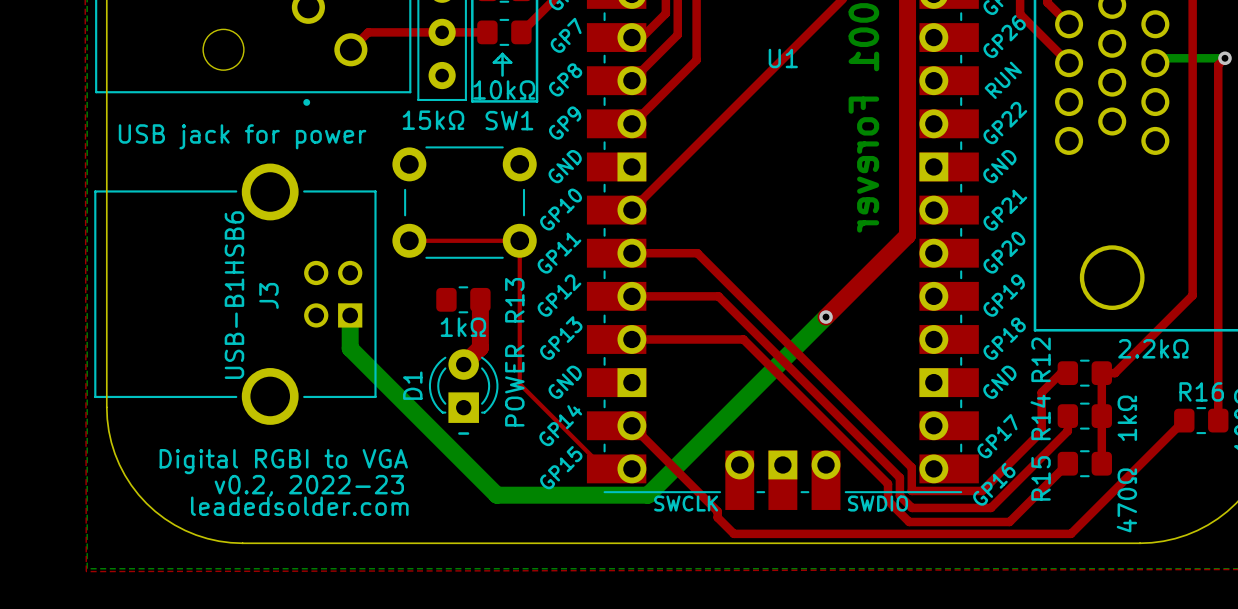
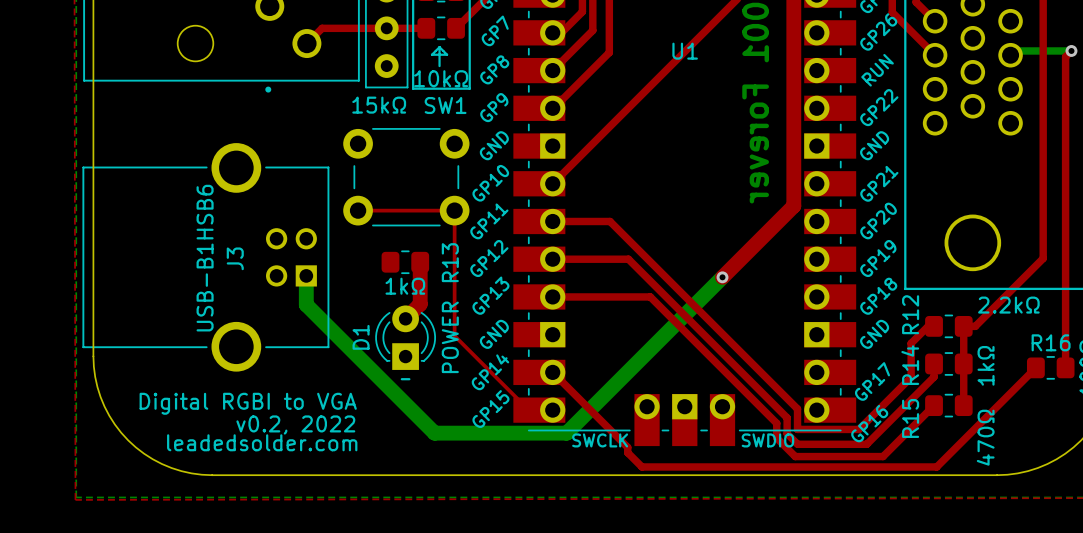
text: USB jack for power (242, 136) -> none
text: v0.2, 2022-23 (309, 485) -> v0.2, 2022 (295, 424)

